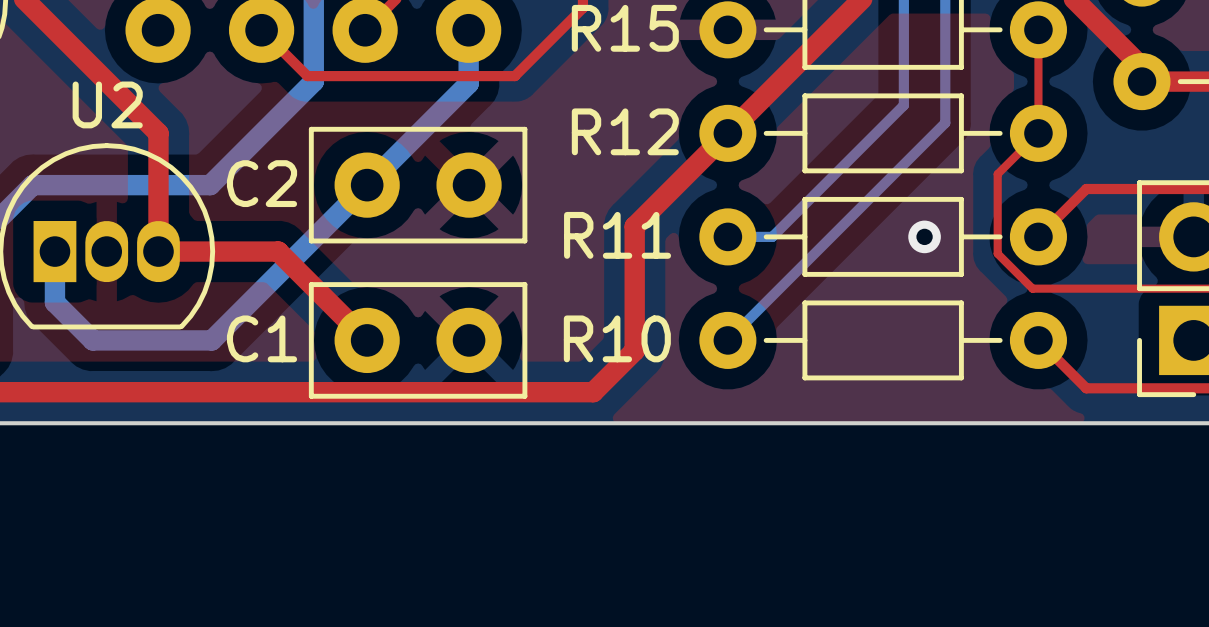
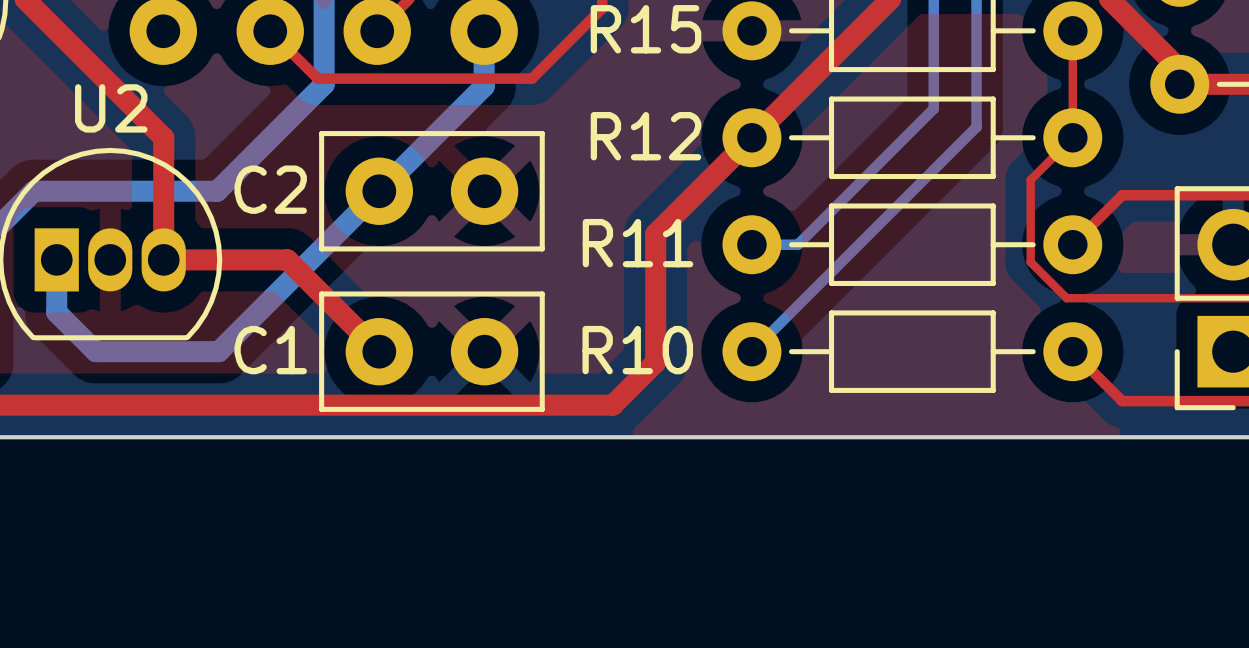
via: (924, 236) -> none

